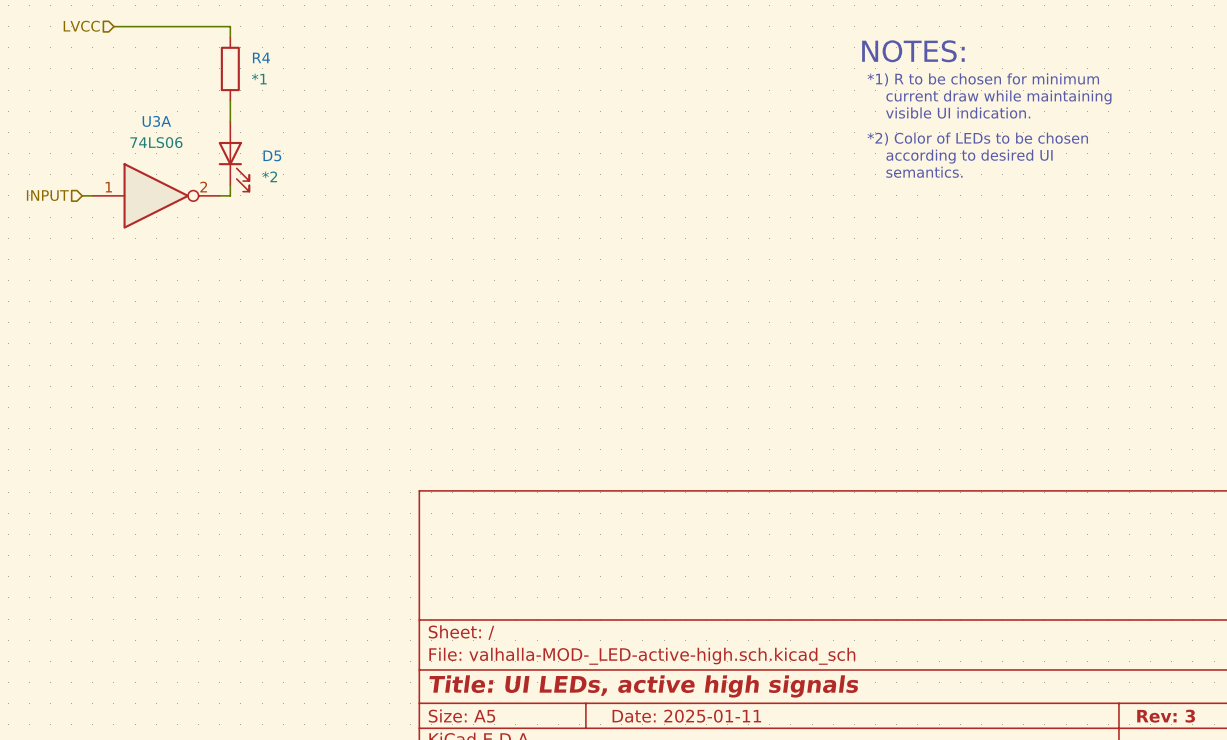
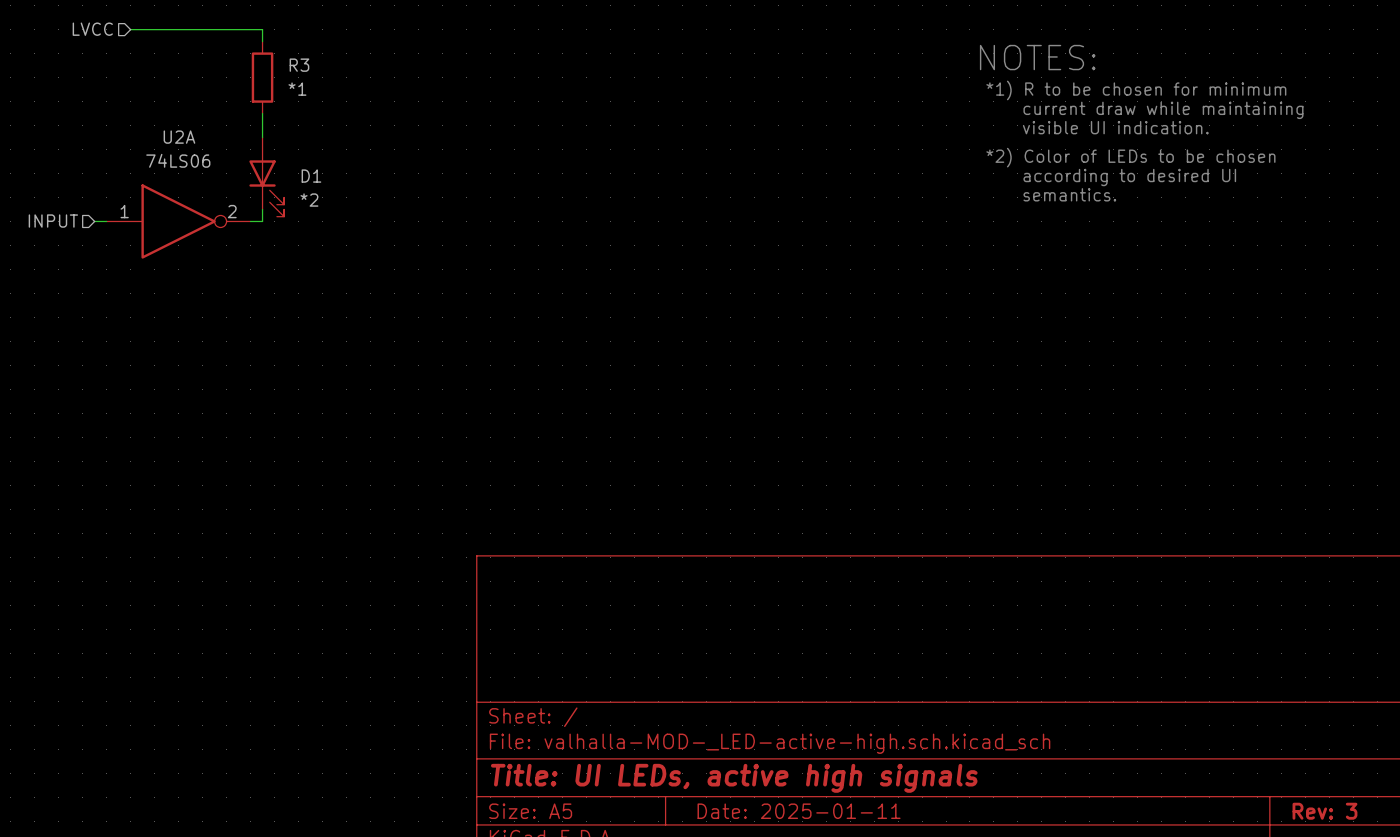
R4 name: R4 (261, 57) -> R3 (299, 65)
U3A name: U3A (156, 121) -> U2A (179, 137)
D5 name: D5 (272, 155) -> D1 (311, 176)

